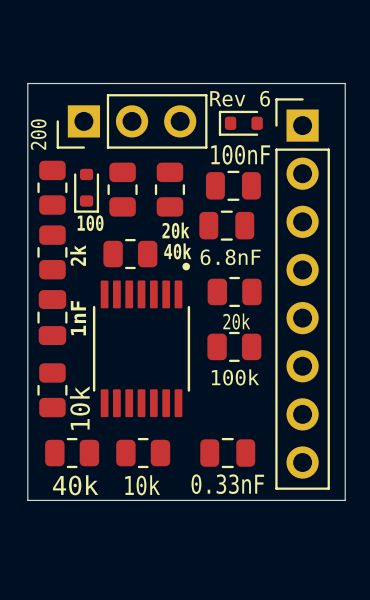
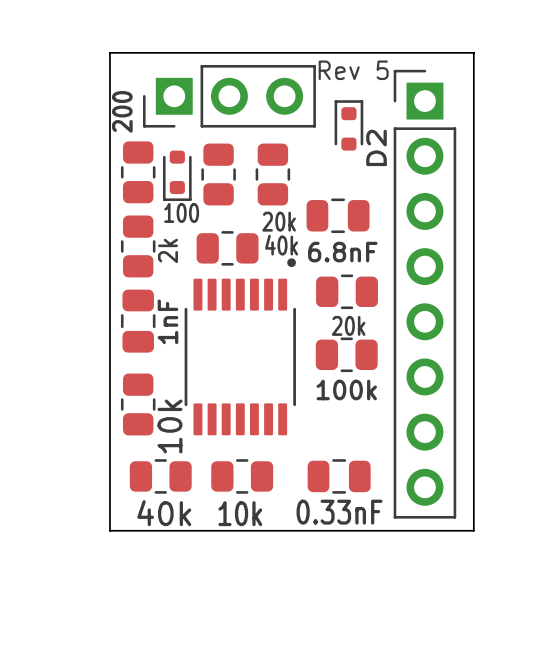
text: Rev 6 (240, 98) -> Rev 5 (353, 70)
part: (240, 123) -> none
D2: none -> (348, 125)
part: 100nF (233, 185) -> none

